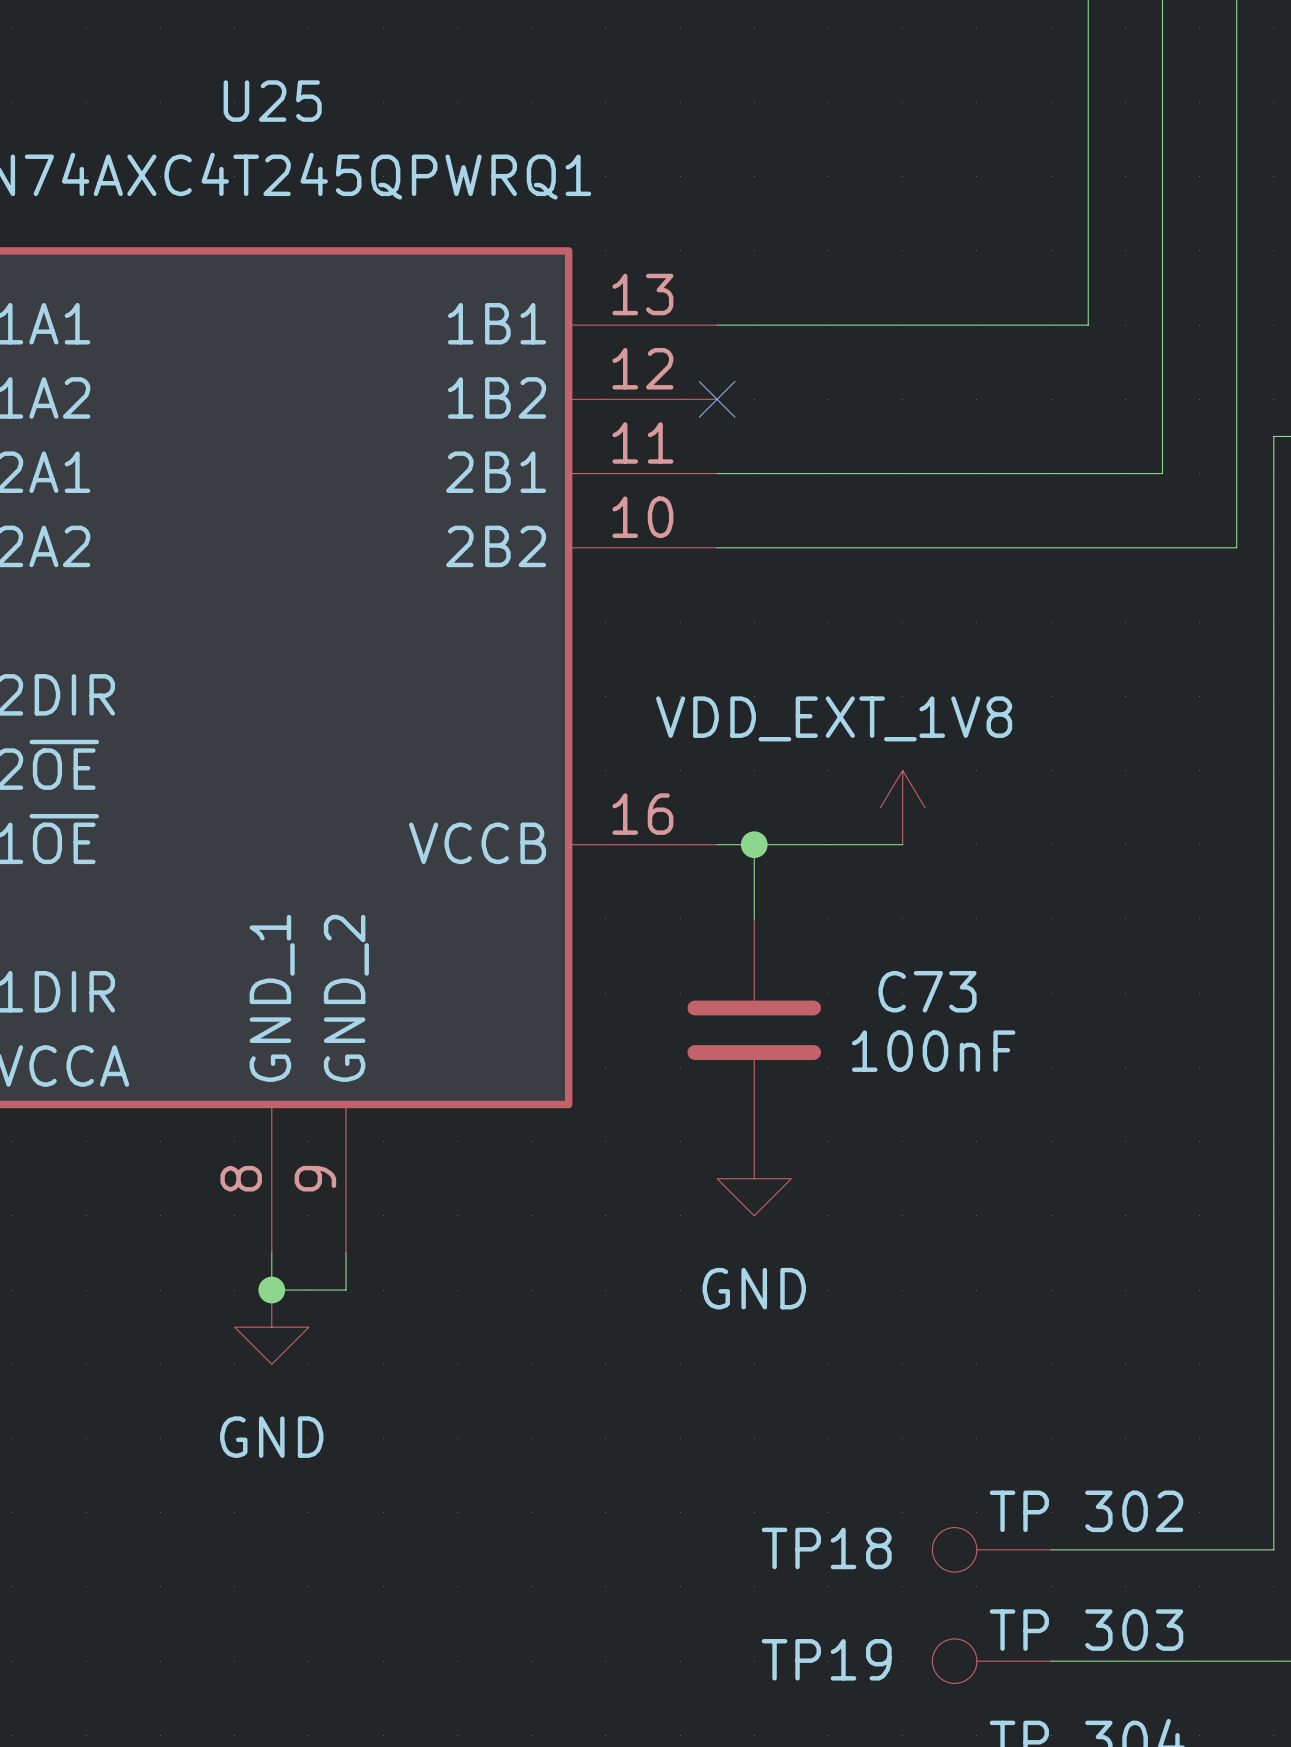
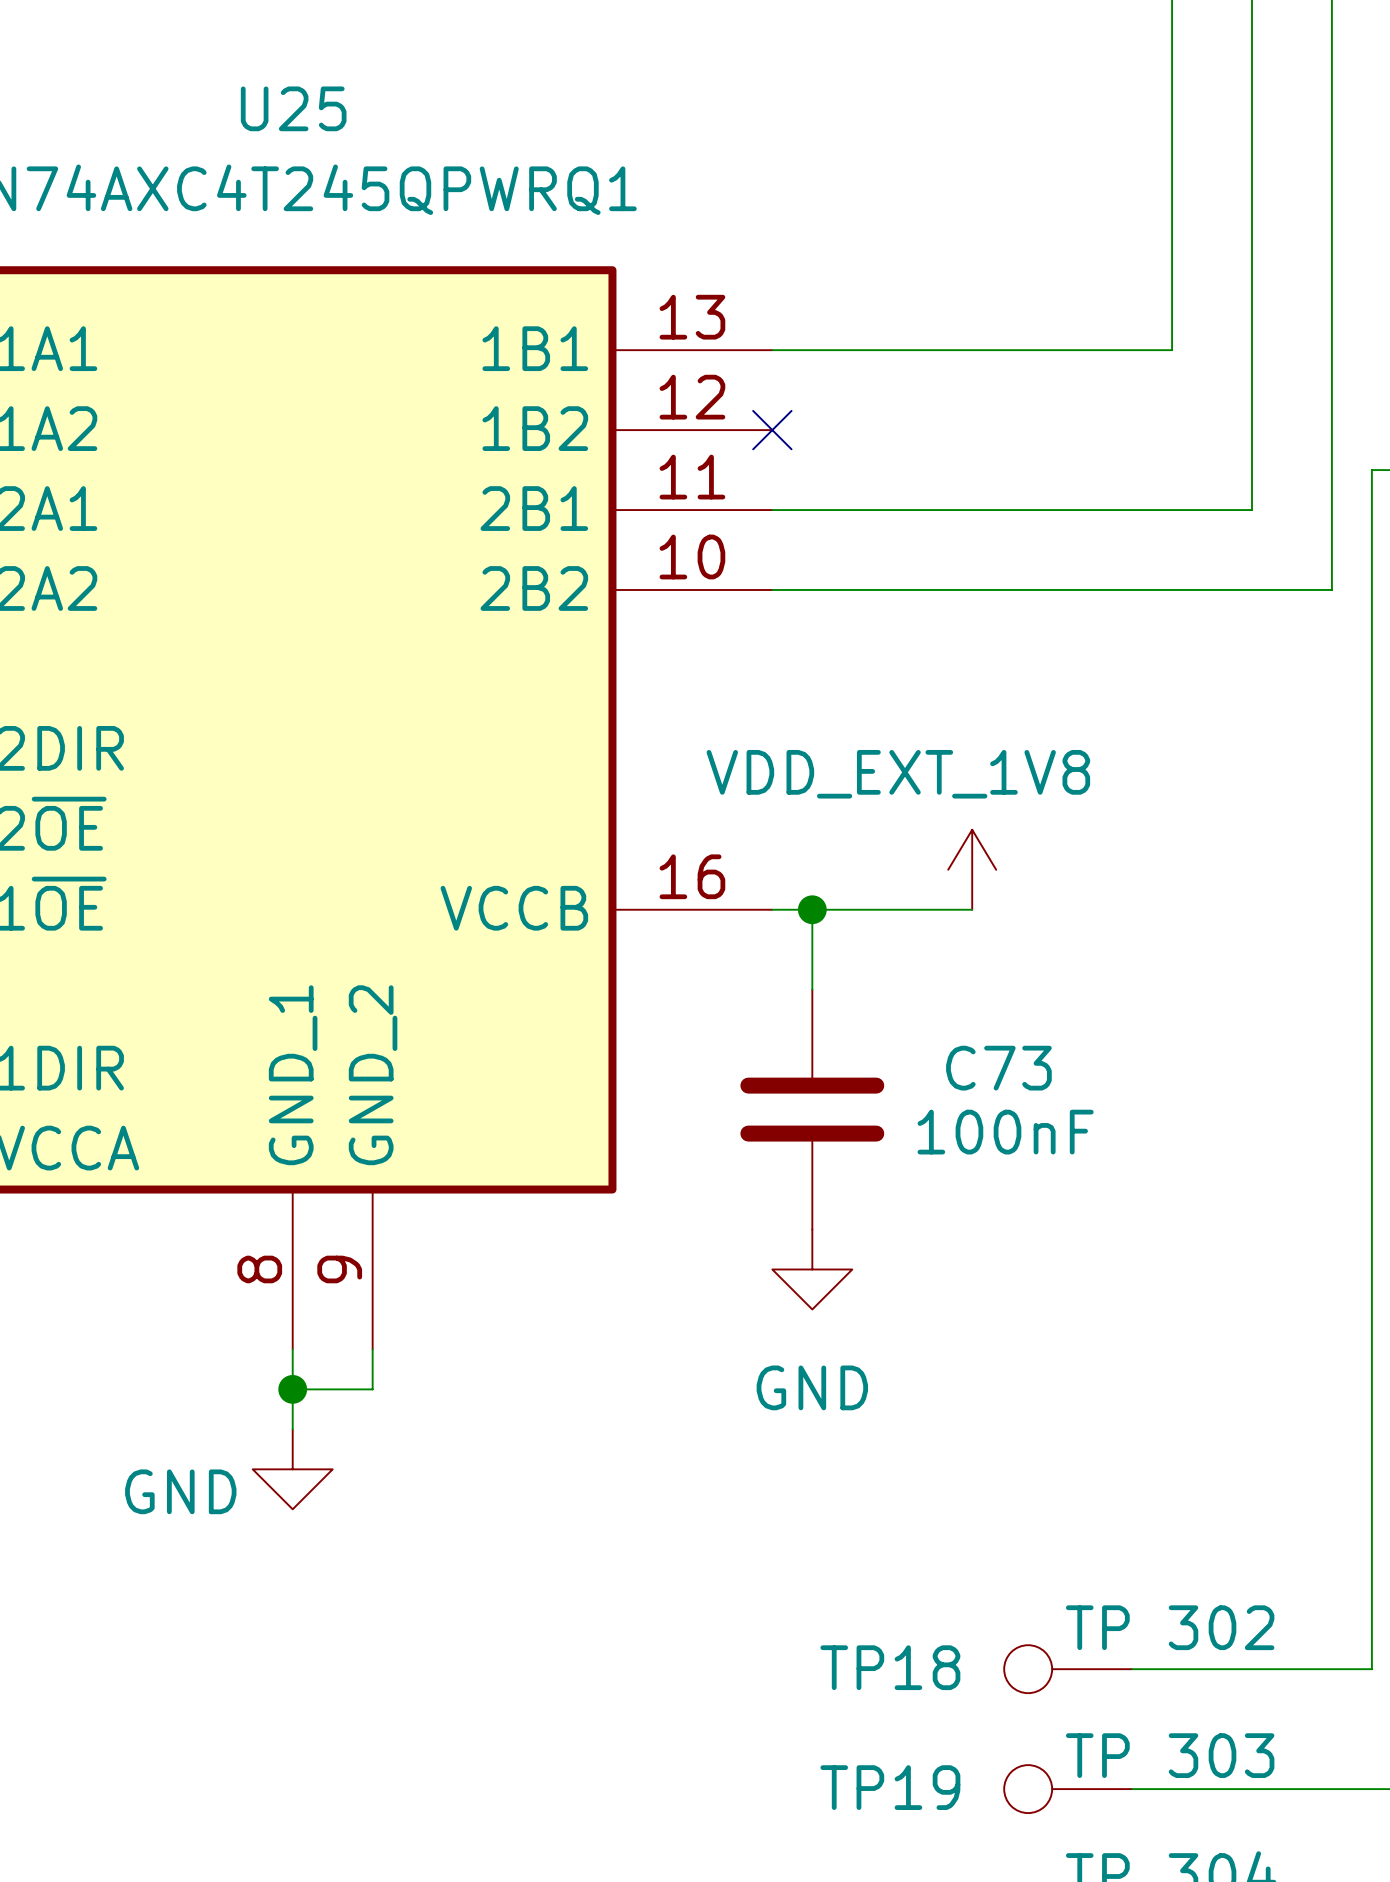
power symbol position: GND (271, 1327) -> GND (292, 1469)
power symbol text position: GND (271, 1437) -> GND (180, 1491)

